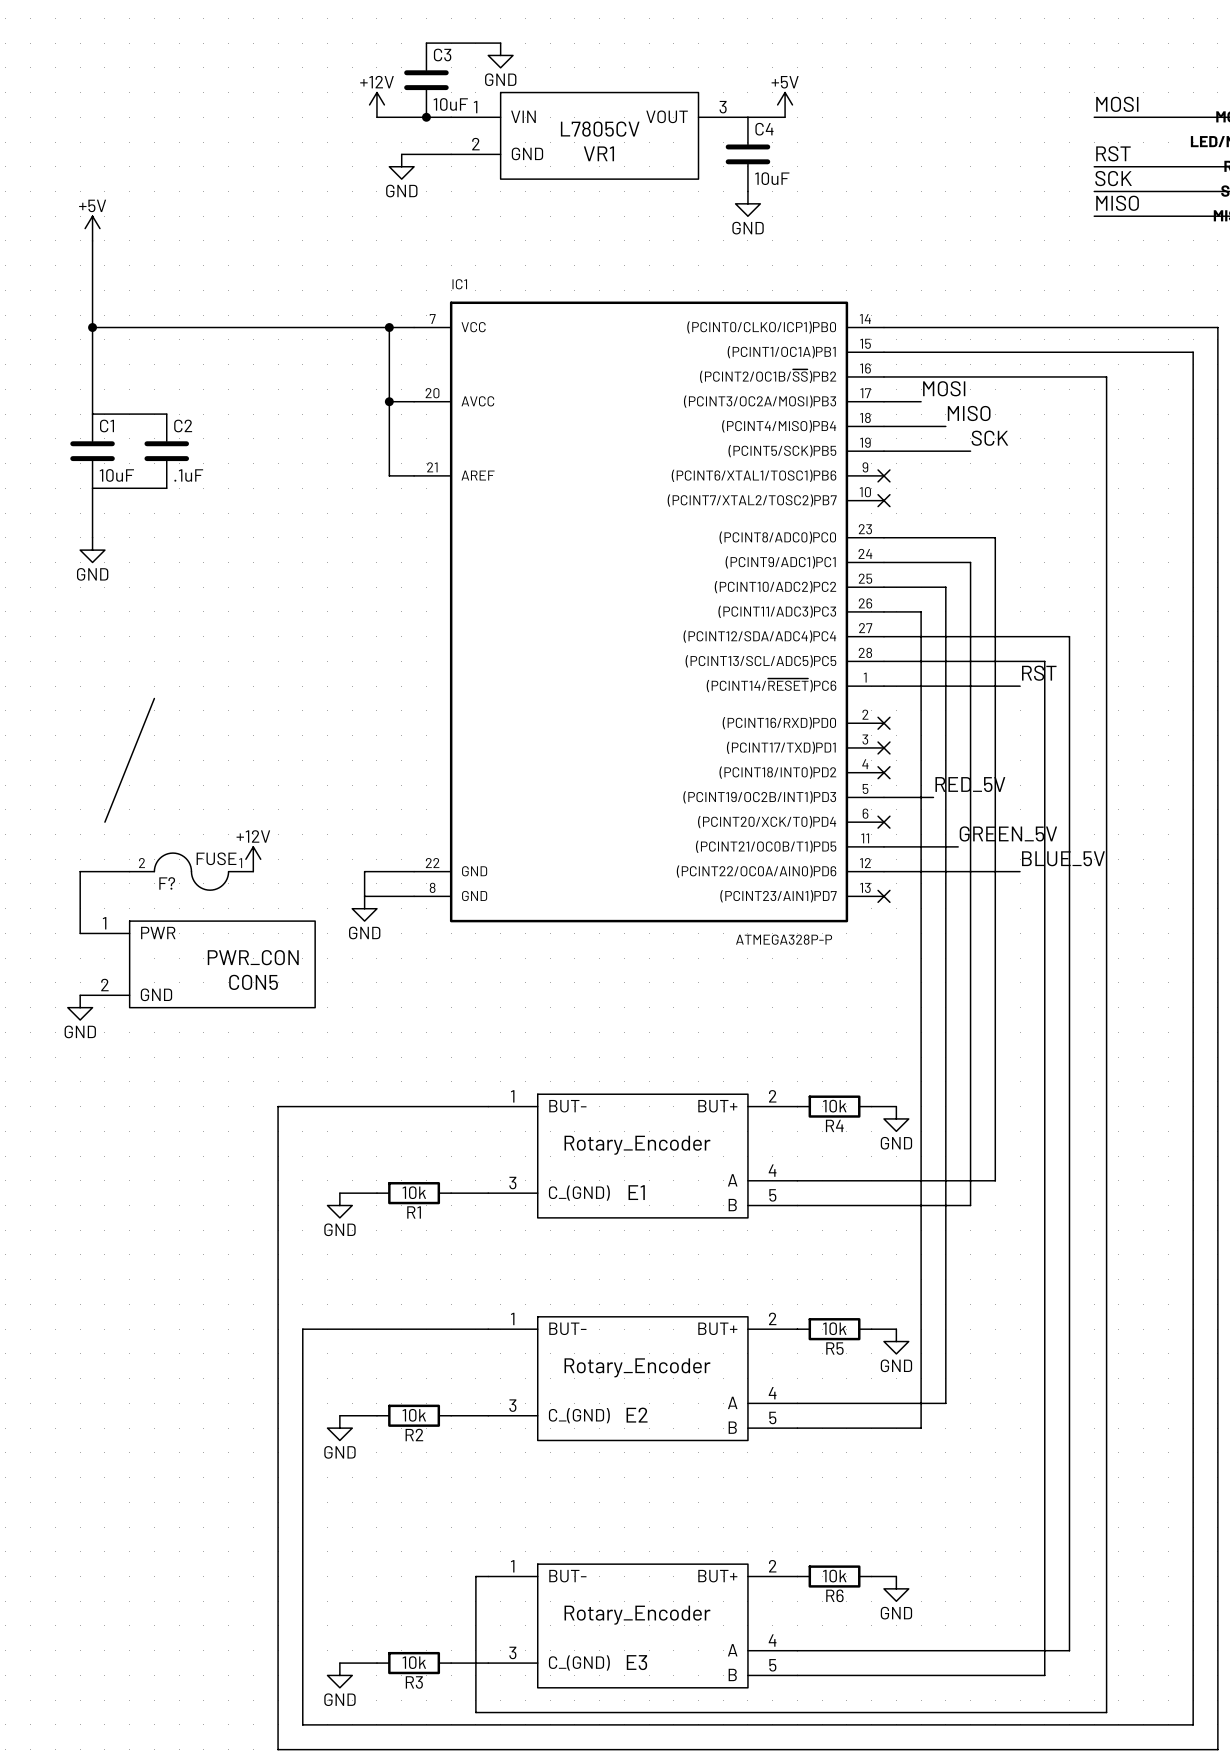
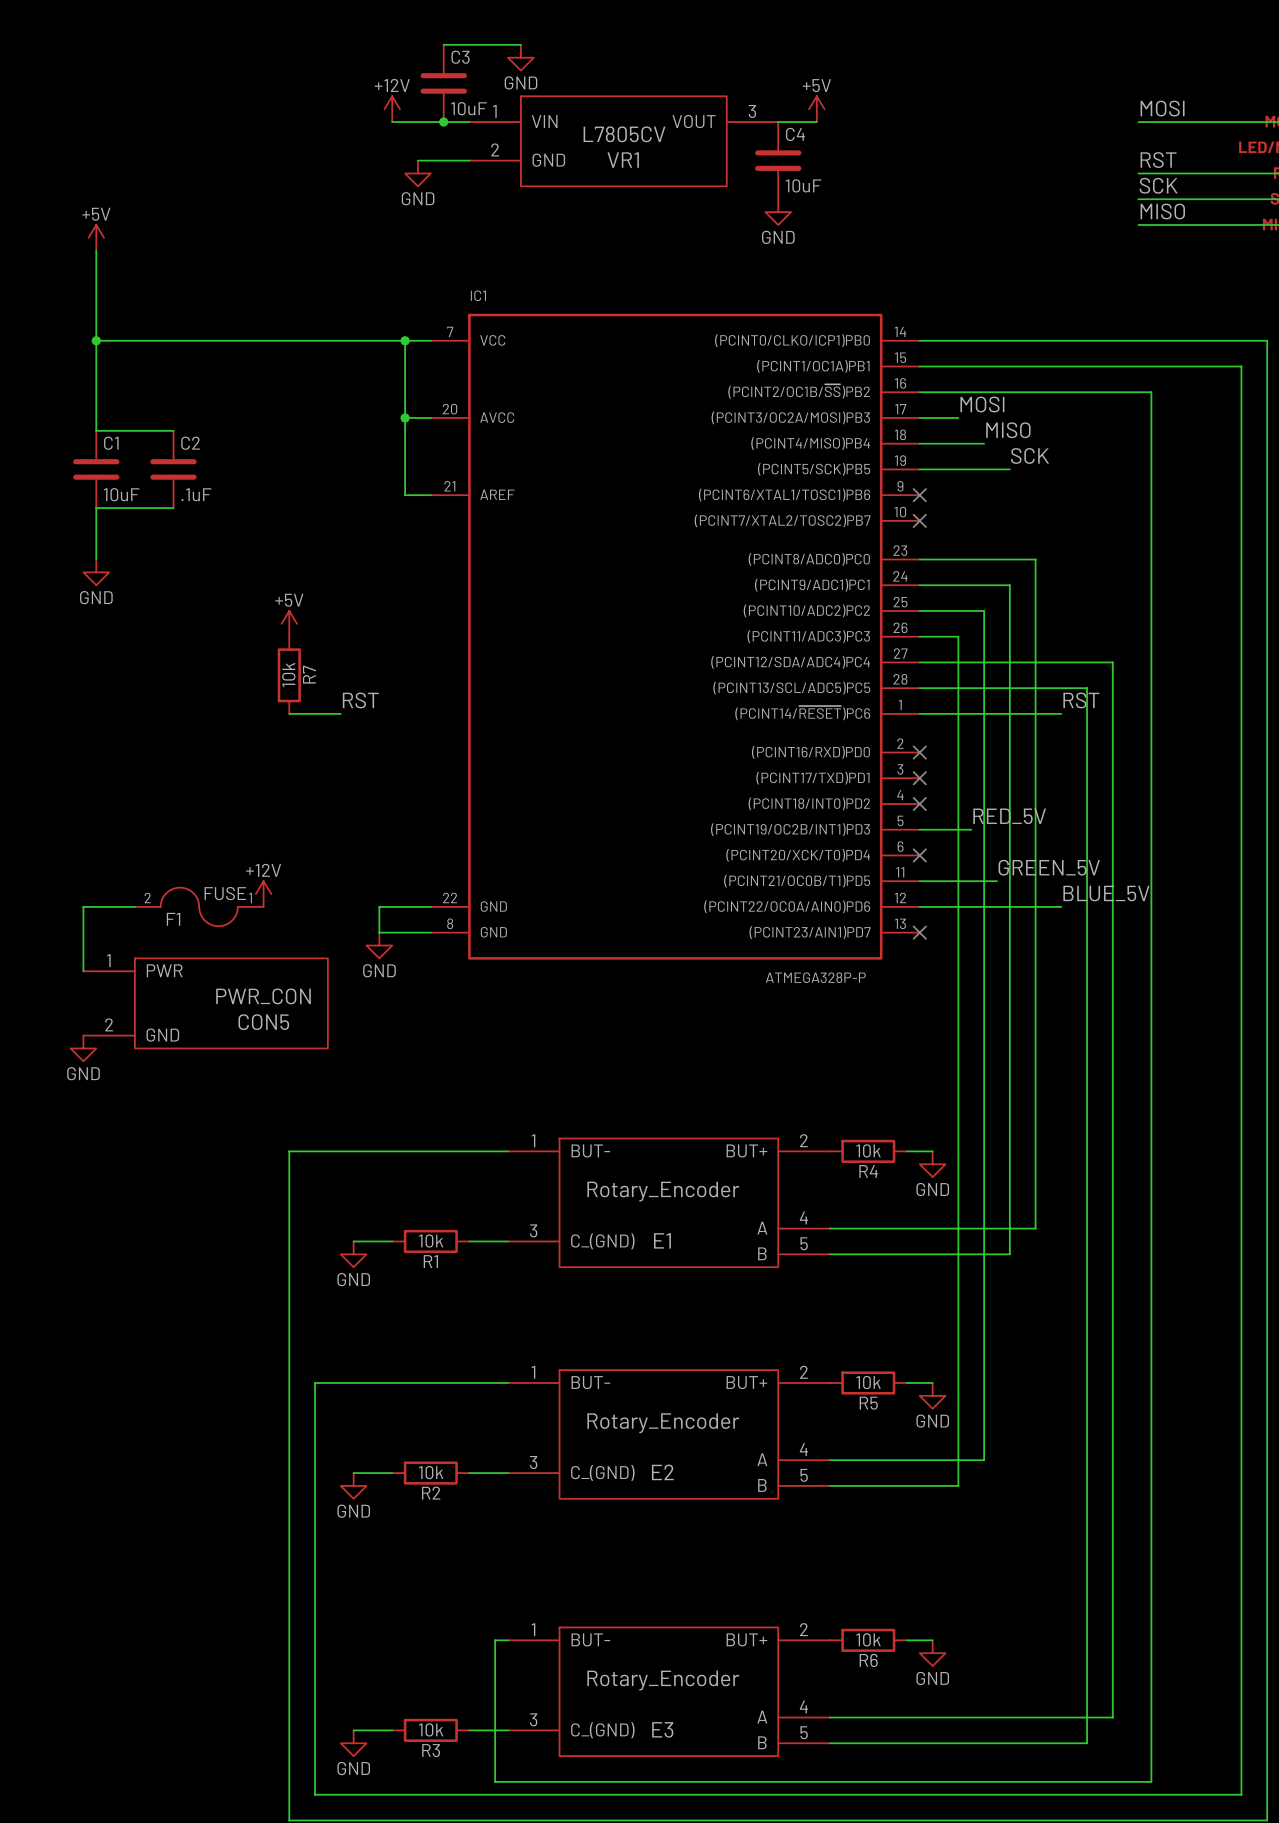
power symbol: none -> +5V (289, 623)
R7: none -> 10k (289, 675)
label: none -> RST (360, 700)
wire: none -> (289, 713) (340, 713)
wire: (154, 698) (104, 822) -> none
F? name: F? (167, 883) -> F1 (173, 919)

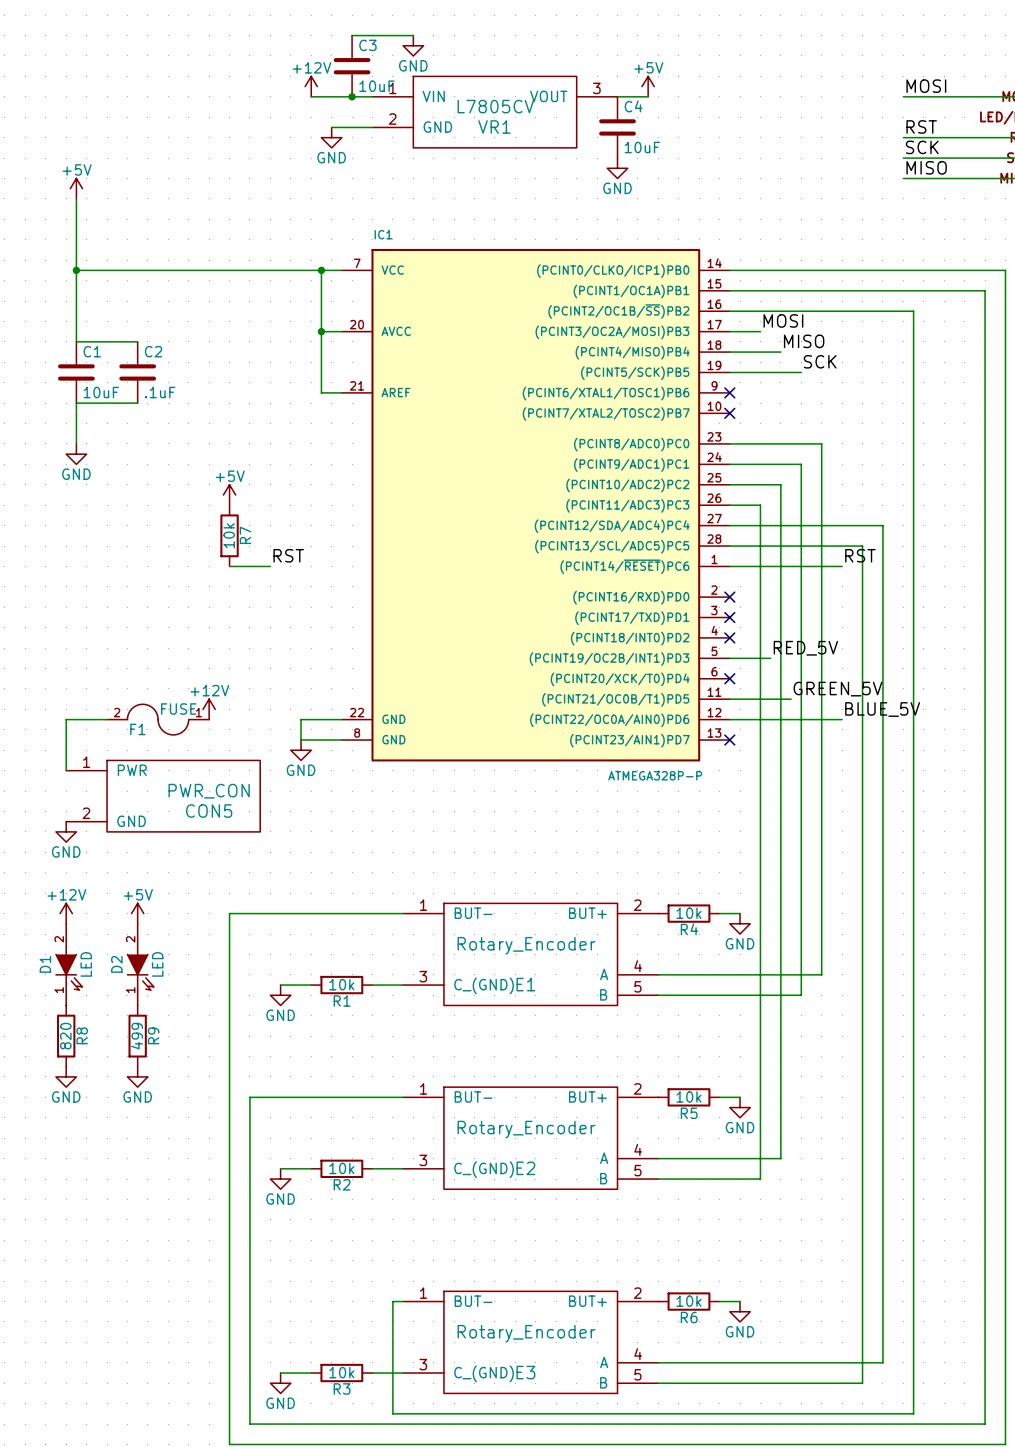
power symbol: none -> +12V (66, 913)
power symbol: none -> +5V (137, 913)
D1: none -> LED (69, 964)
D2: none -> LED (140, 964)
R8: none -> 820 (66, 1036)
R9: none -> 499 (137, 1036)
power symbol: none -> GND (66, 1076)
power symbol: none -> GND (137, 1076)

